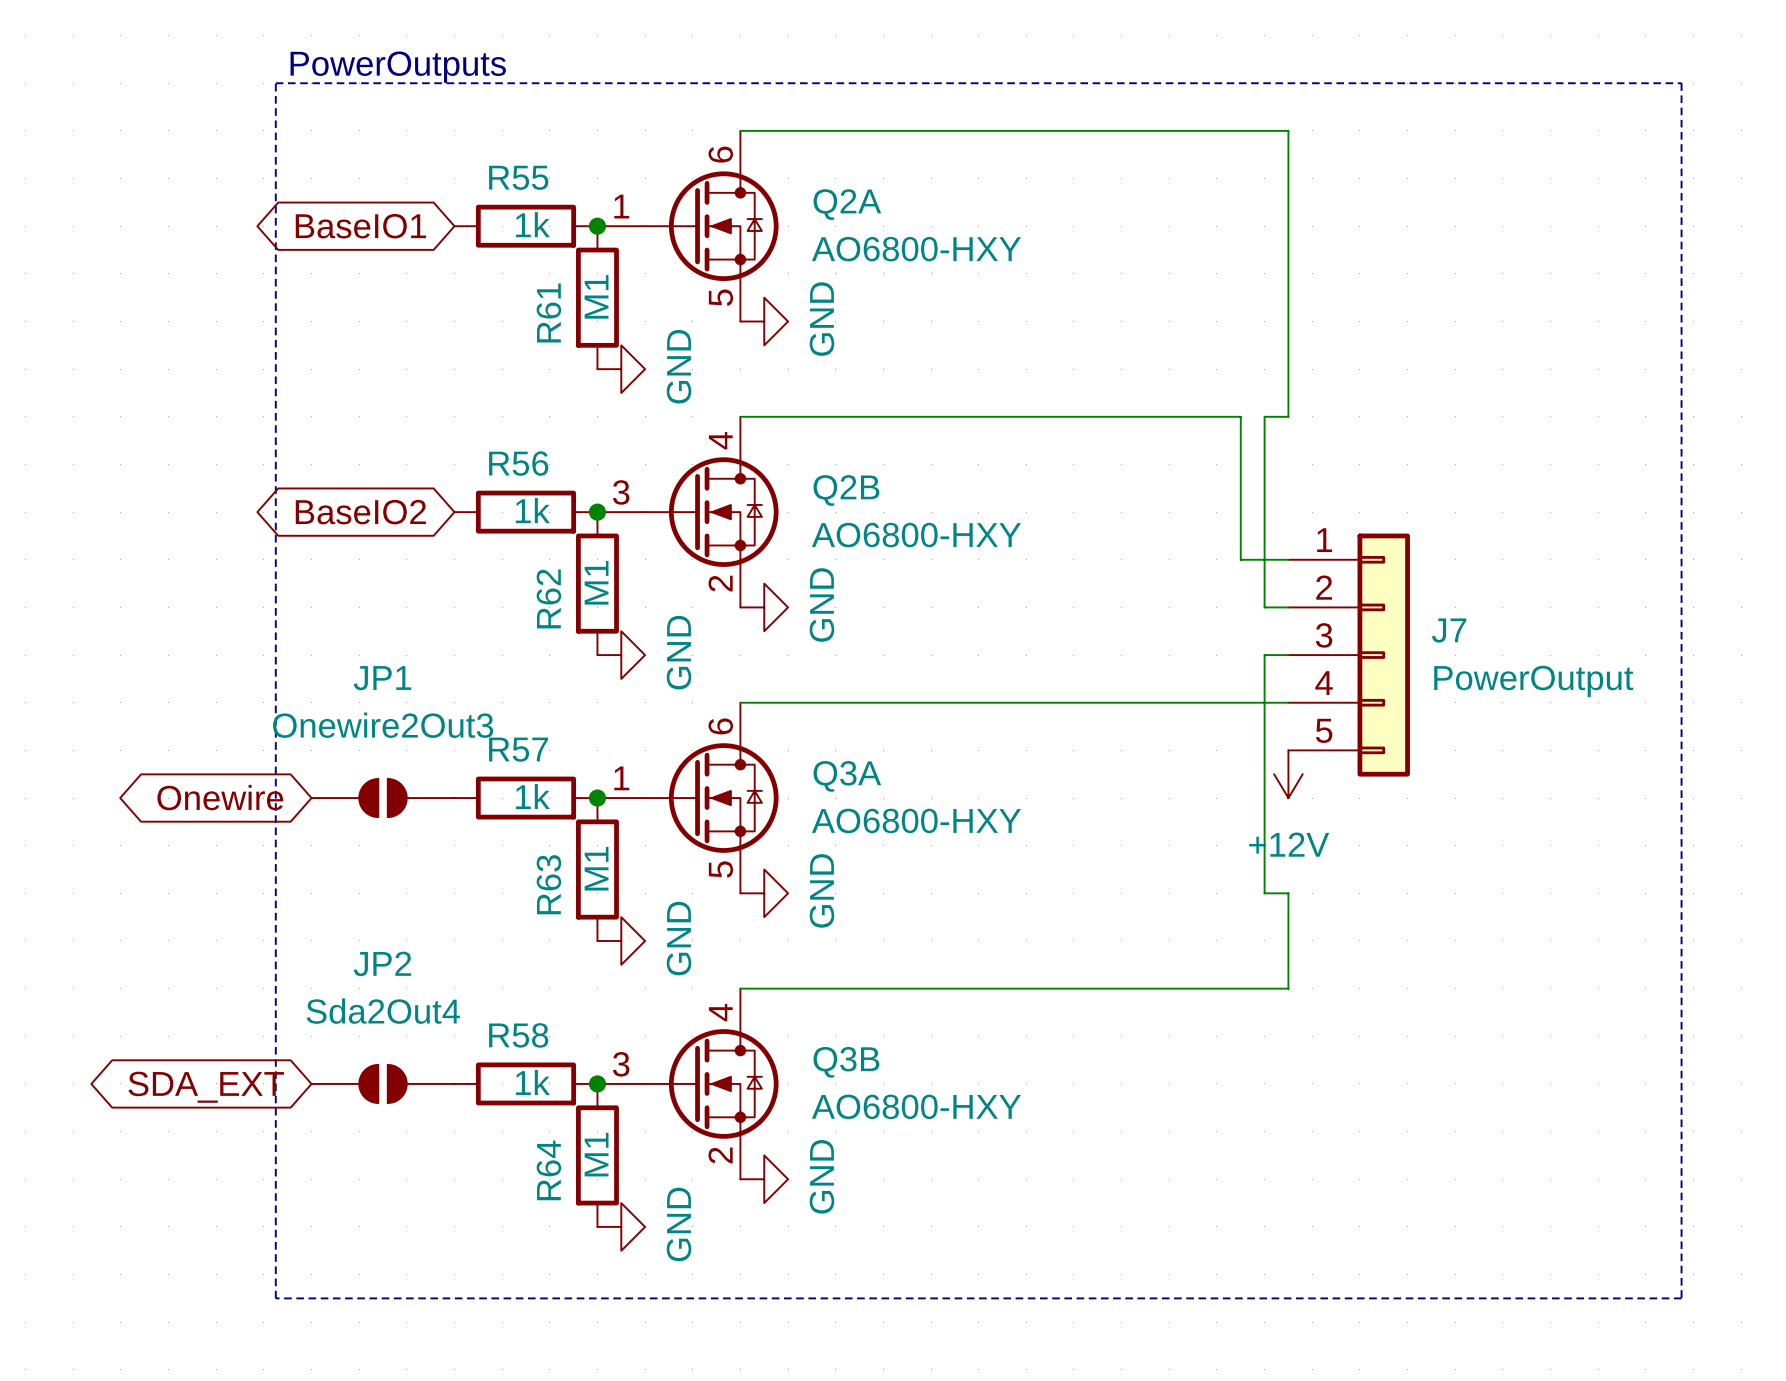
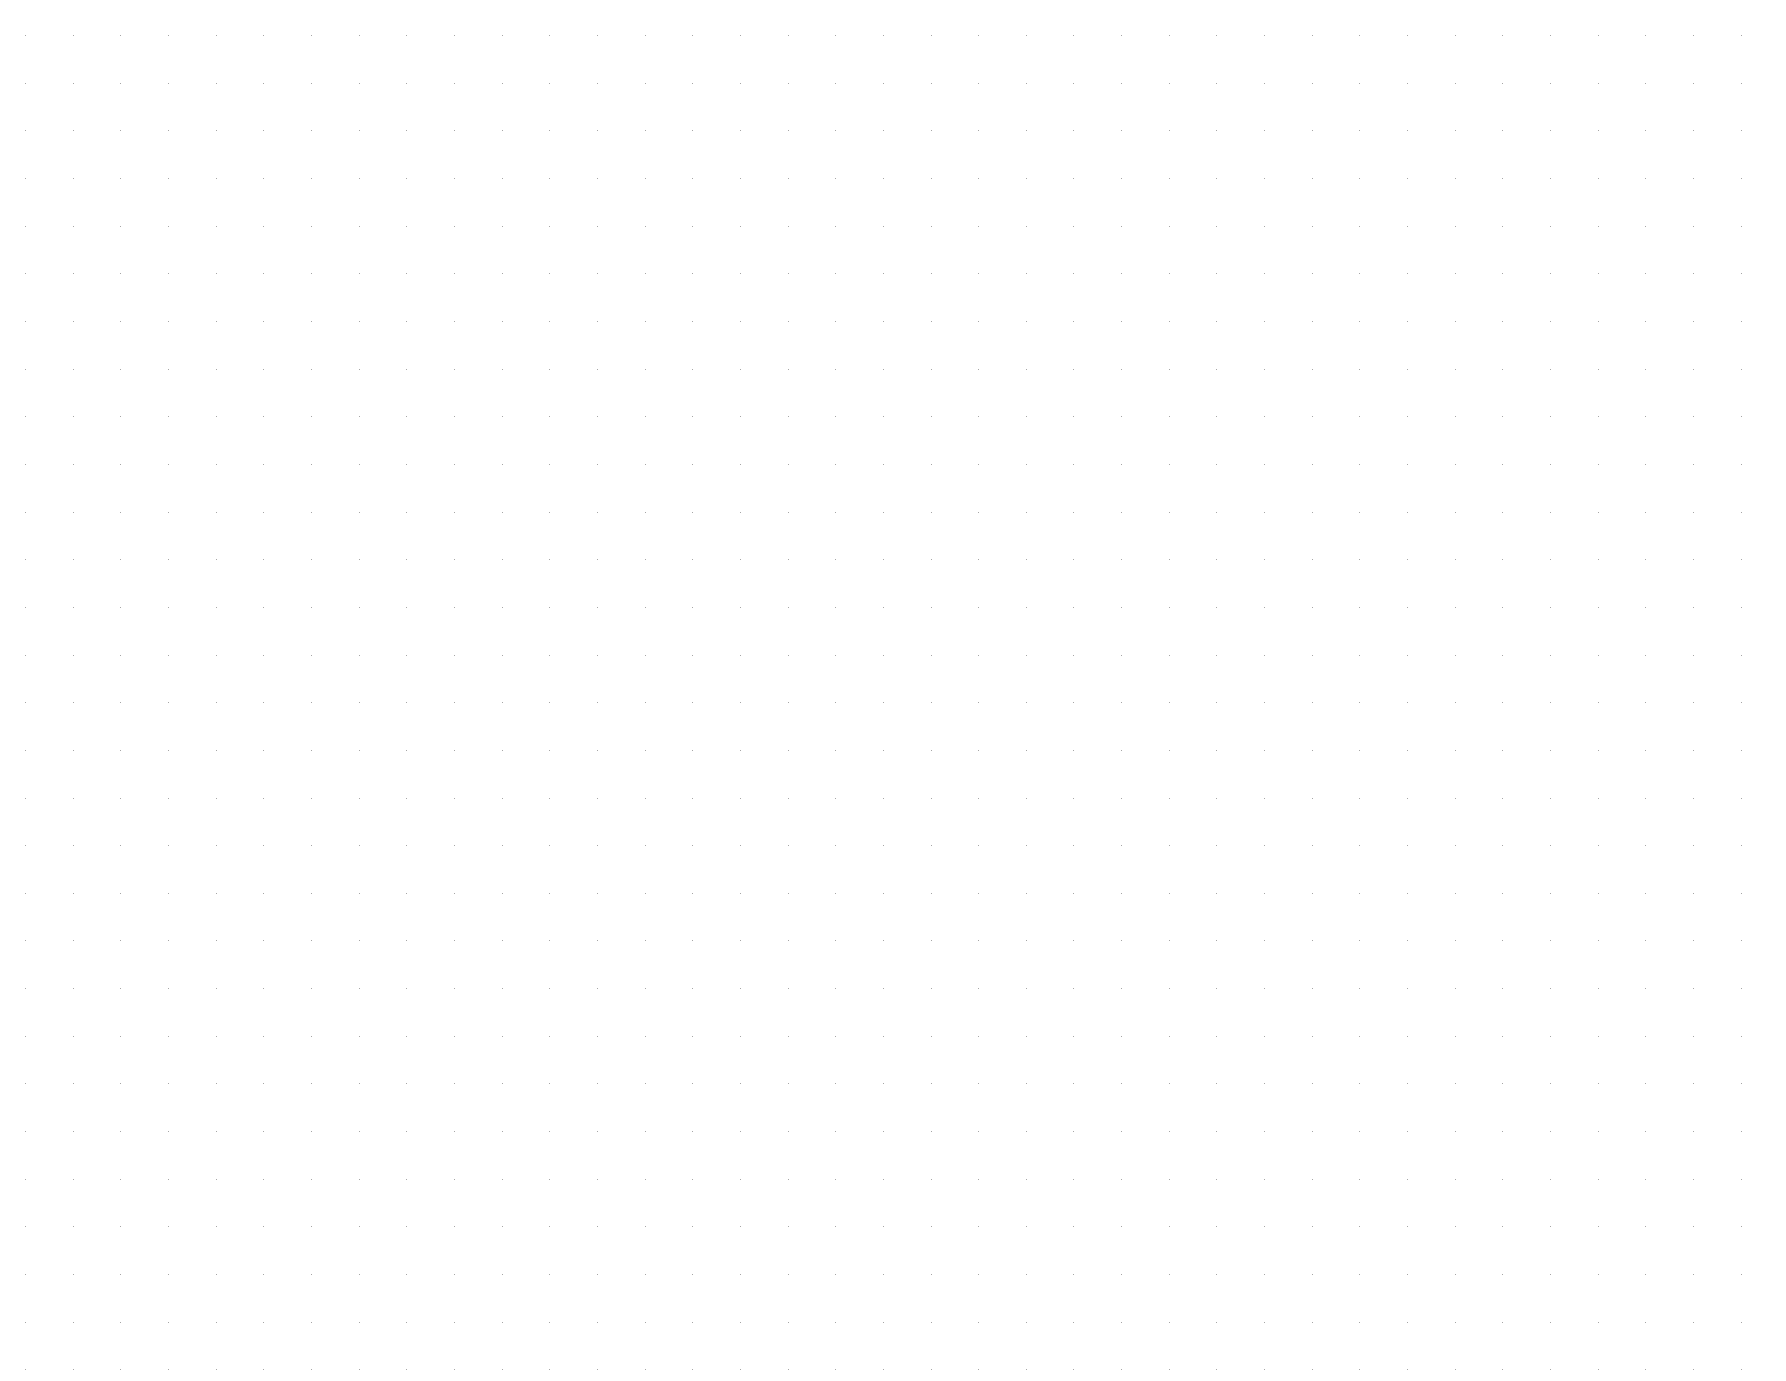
text: PowerOutputs (398, 67) -> none
line: (275, 83) (1681, 83) (1681, 1298) (275, 1298) (275, 83) -> none
wire: (740, 130) (1288, 130) (1288, 416) (1264, 416) (1264, 607) (1288, 607) -> none
global label: BaseIO1 (360, 226) -> none
R55: 1k (525, 226) -> none
junction: (597, 226) -> none
Q2A: AO6800-HXY (687, 226) -> none
R61: M1 (597, 297) -> none
power symbol: GND (764, 321) -> none
power symbol: GND (621, 369) -> none
wire: (740, 416) (1240, 416) (1240, 559) (1288, 559) -> none
global label: BaseIO2 (360, 512) -> none
R56: 1k (525, 512) -> none
junction: (597, 512) -> none
Q2B: AO6800-HXY (687, 512) -> none
R62: M1 (597, 583) -> none
power symbol: GND (764, 607) -> none
power symbol: GND (621, 655) -> none
wire: (1288, 655) (1264, 655) (1264, 893) (1288, 893) (1288, 988) (740, 988) -> none
J7: PowerOutput (1349, 655) -> none
wire: (740, 702) (1288, 702) -> none
power symbol: +12V (1288, 774) -> none
global label: Onewire (220, 797) -> none
JP1: Onewire2Out3 (383, 798) -> none
R57: 1k (525, 798) -> none
junction: (597, 798) -> none
Q3A: AO6800-HXY (687, 798) -> none
R63: M1 (597, 869) -> none
power symbol: GND (764, 893) -> none
power symbol: GND (621, 940) -> none
JP2: Sda2Out4 (383, 1083) -> none
R58: 1k (525, 1083) -> none
junction: (597, 1083) -> none
Q3B: AO6800-HXY (687, 1083) -> none
global label: SDA_EXT (206, 1087) -> none
R64: M1 (597, 1155) -> none
power symbol: GND (764, 1179) -> none
power symbol: GND (621, 1226) -> none

